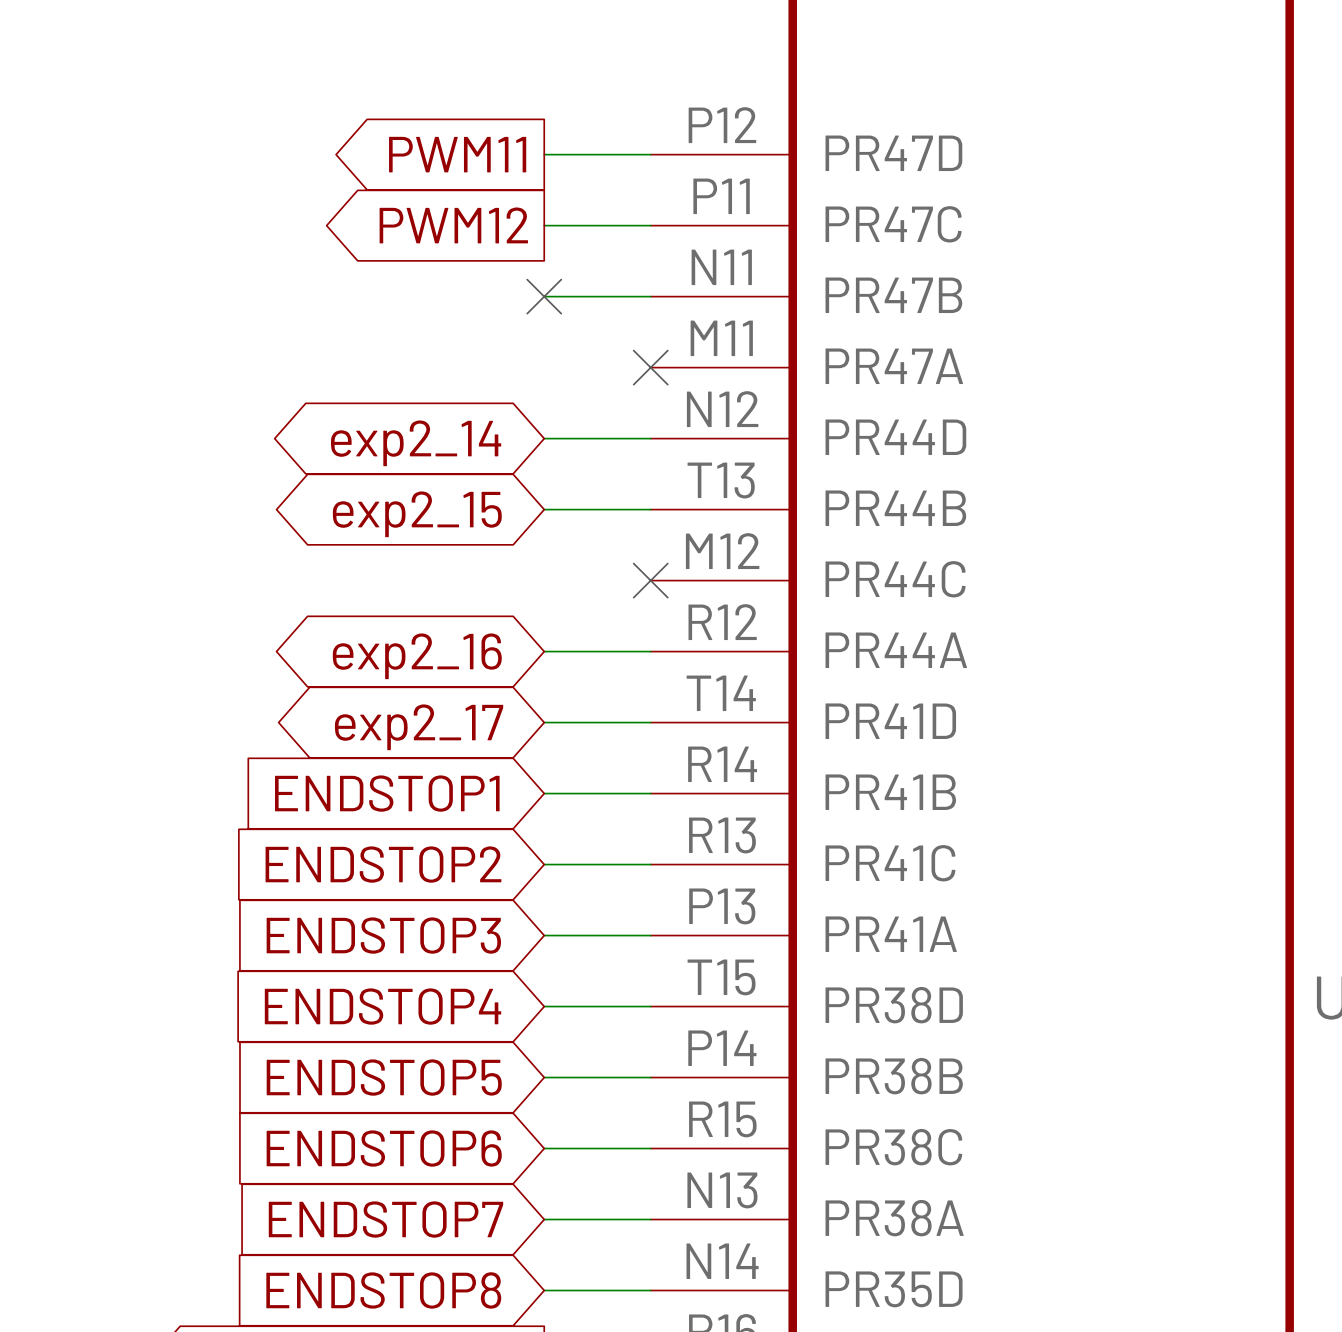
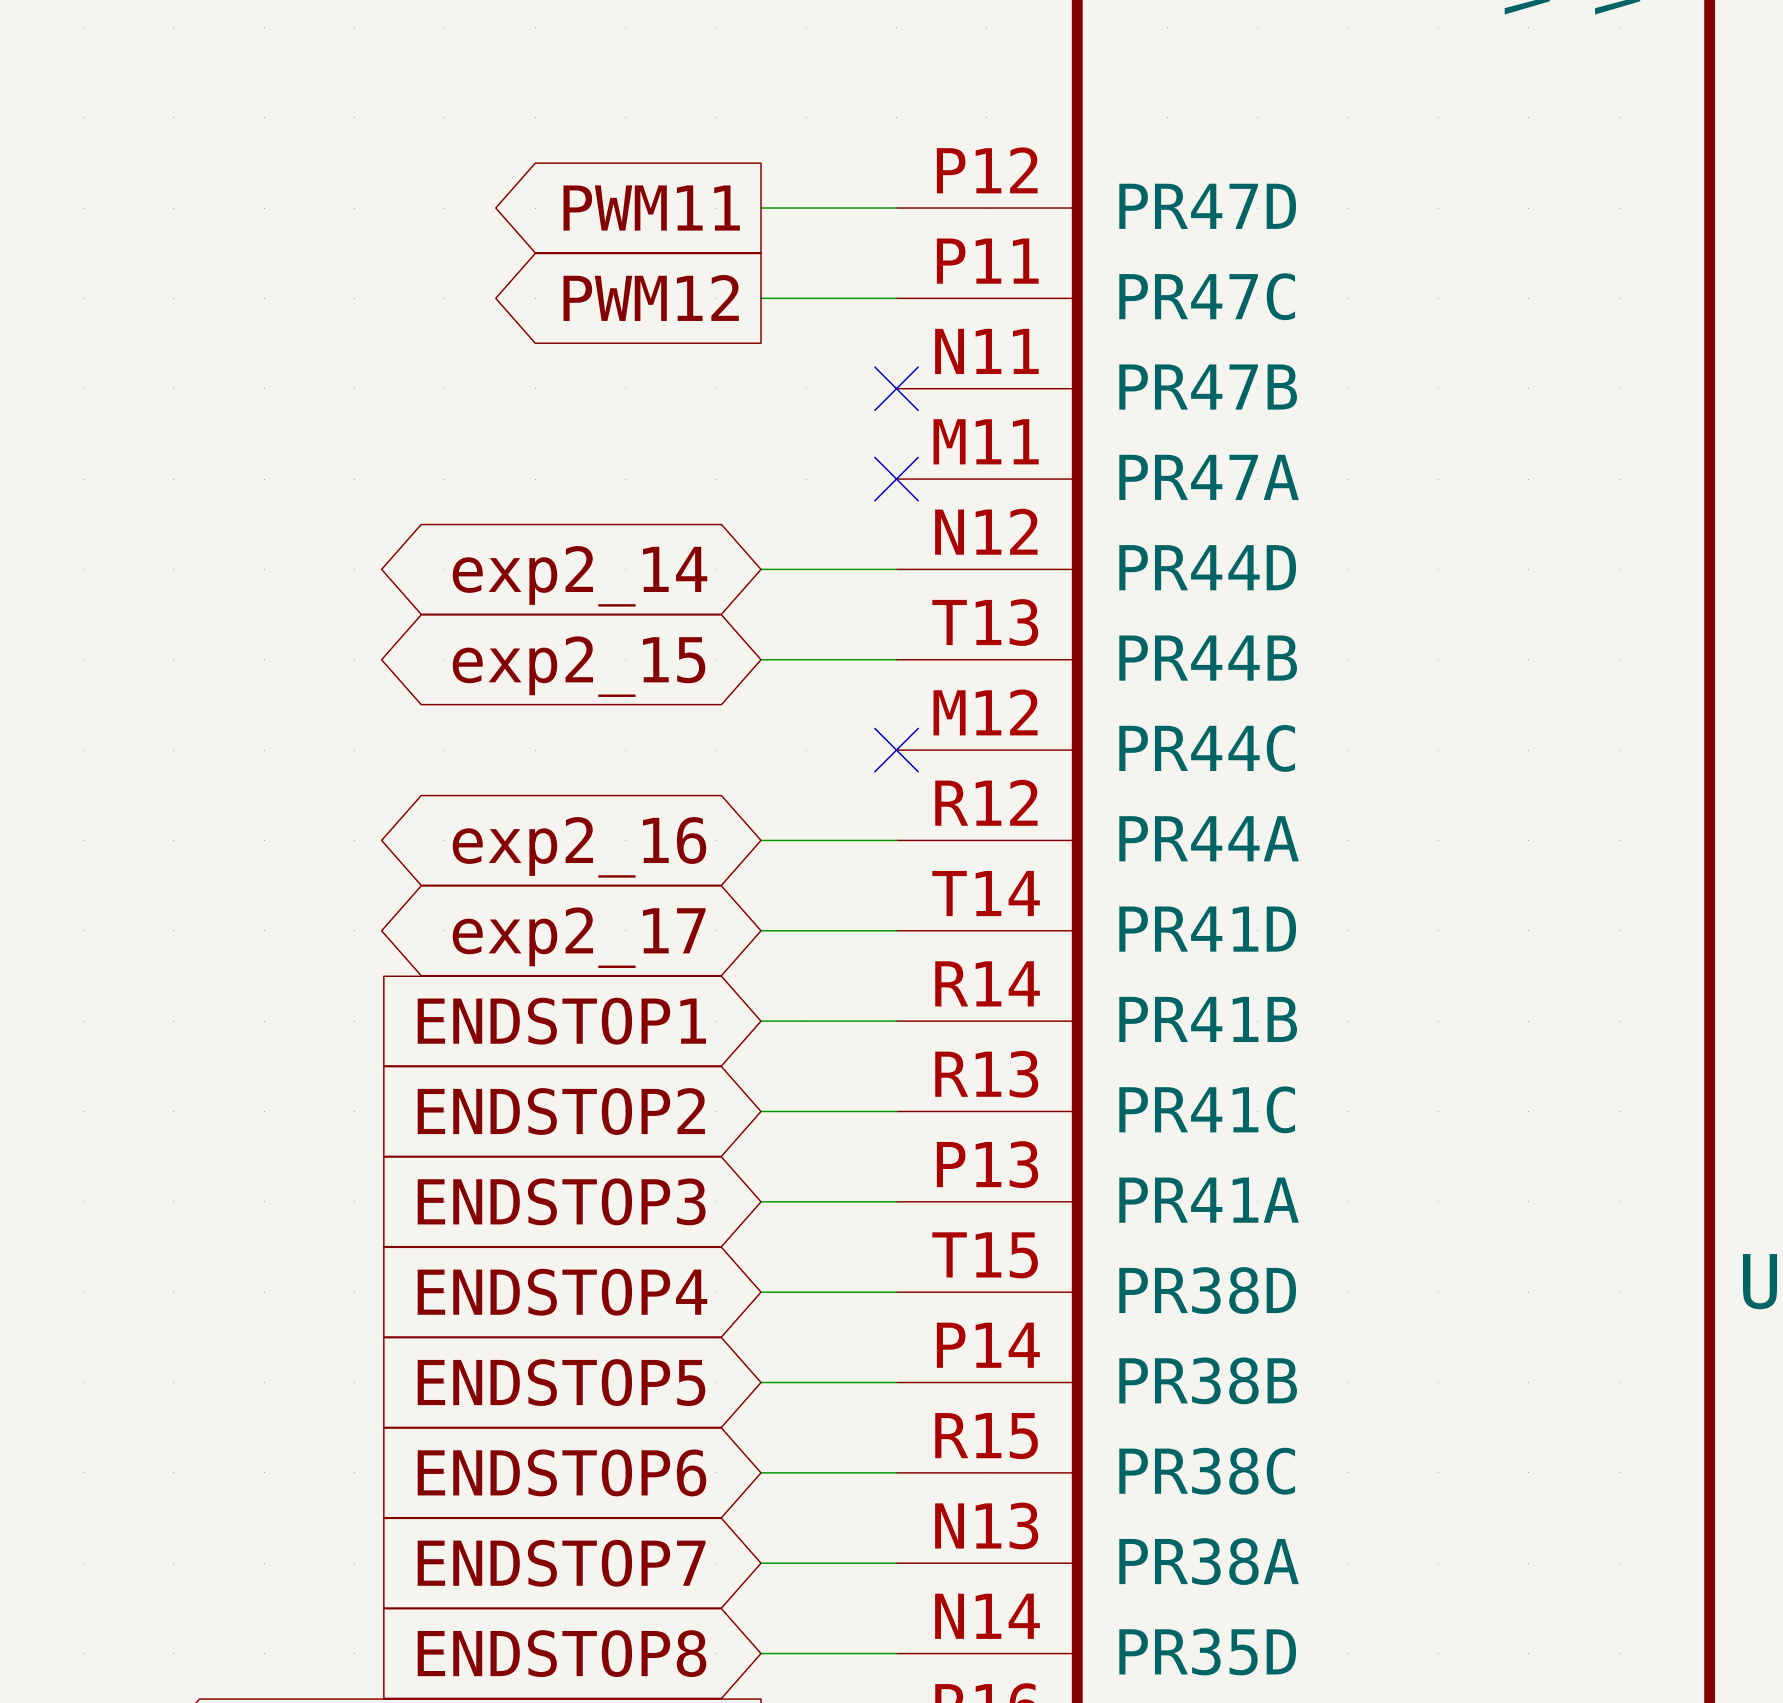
wire: (544, 296) (650, 296) -> none
no-connect mark position: (544, 296) -> (896, 388)

